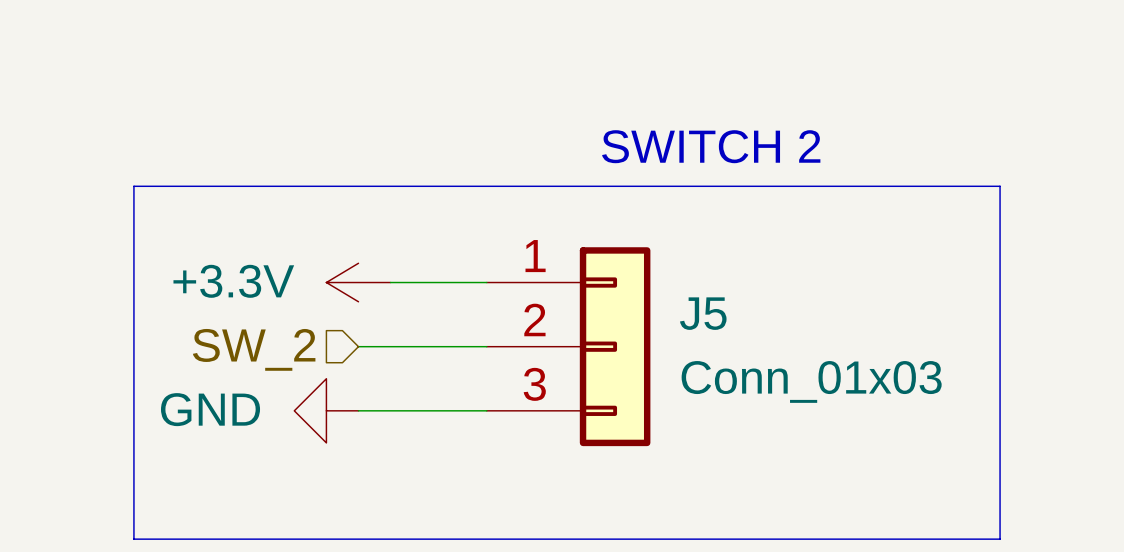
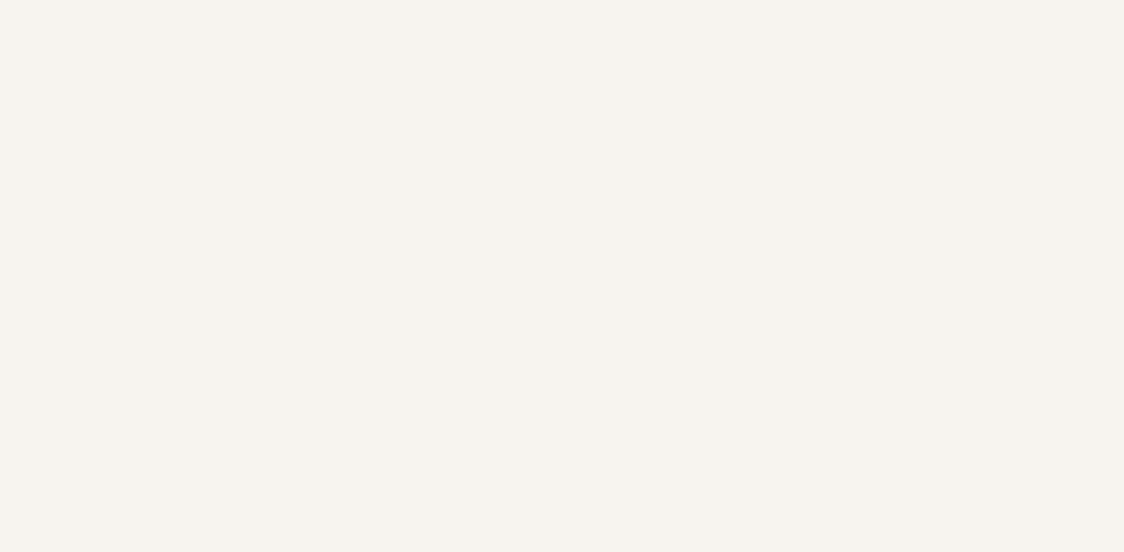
text: SWITCH 2 (711, 146) -> none
line: (133, 186) (1000, 186) (1000, 539) (133, 539) (133, 186) -> none
power symbol: +3.3V (358, 282) -> none
wire: (390, 282) (486, 282) -> none
wire: (358, 346) (486, 346) -> none
J5: Conn_01x03 (568, 346) -> none
hierarchical label: SW_2 (254, 349) -> none
power symbol: GND (326, 410) -> none
wire: (358, 410) (486, 410) -> none

